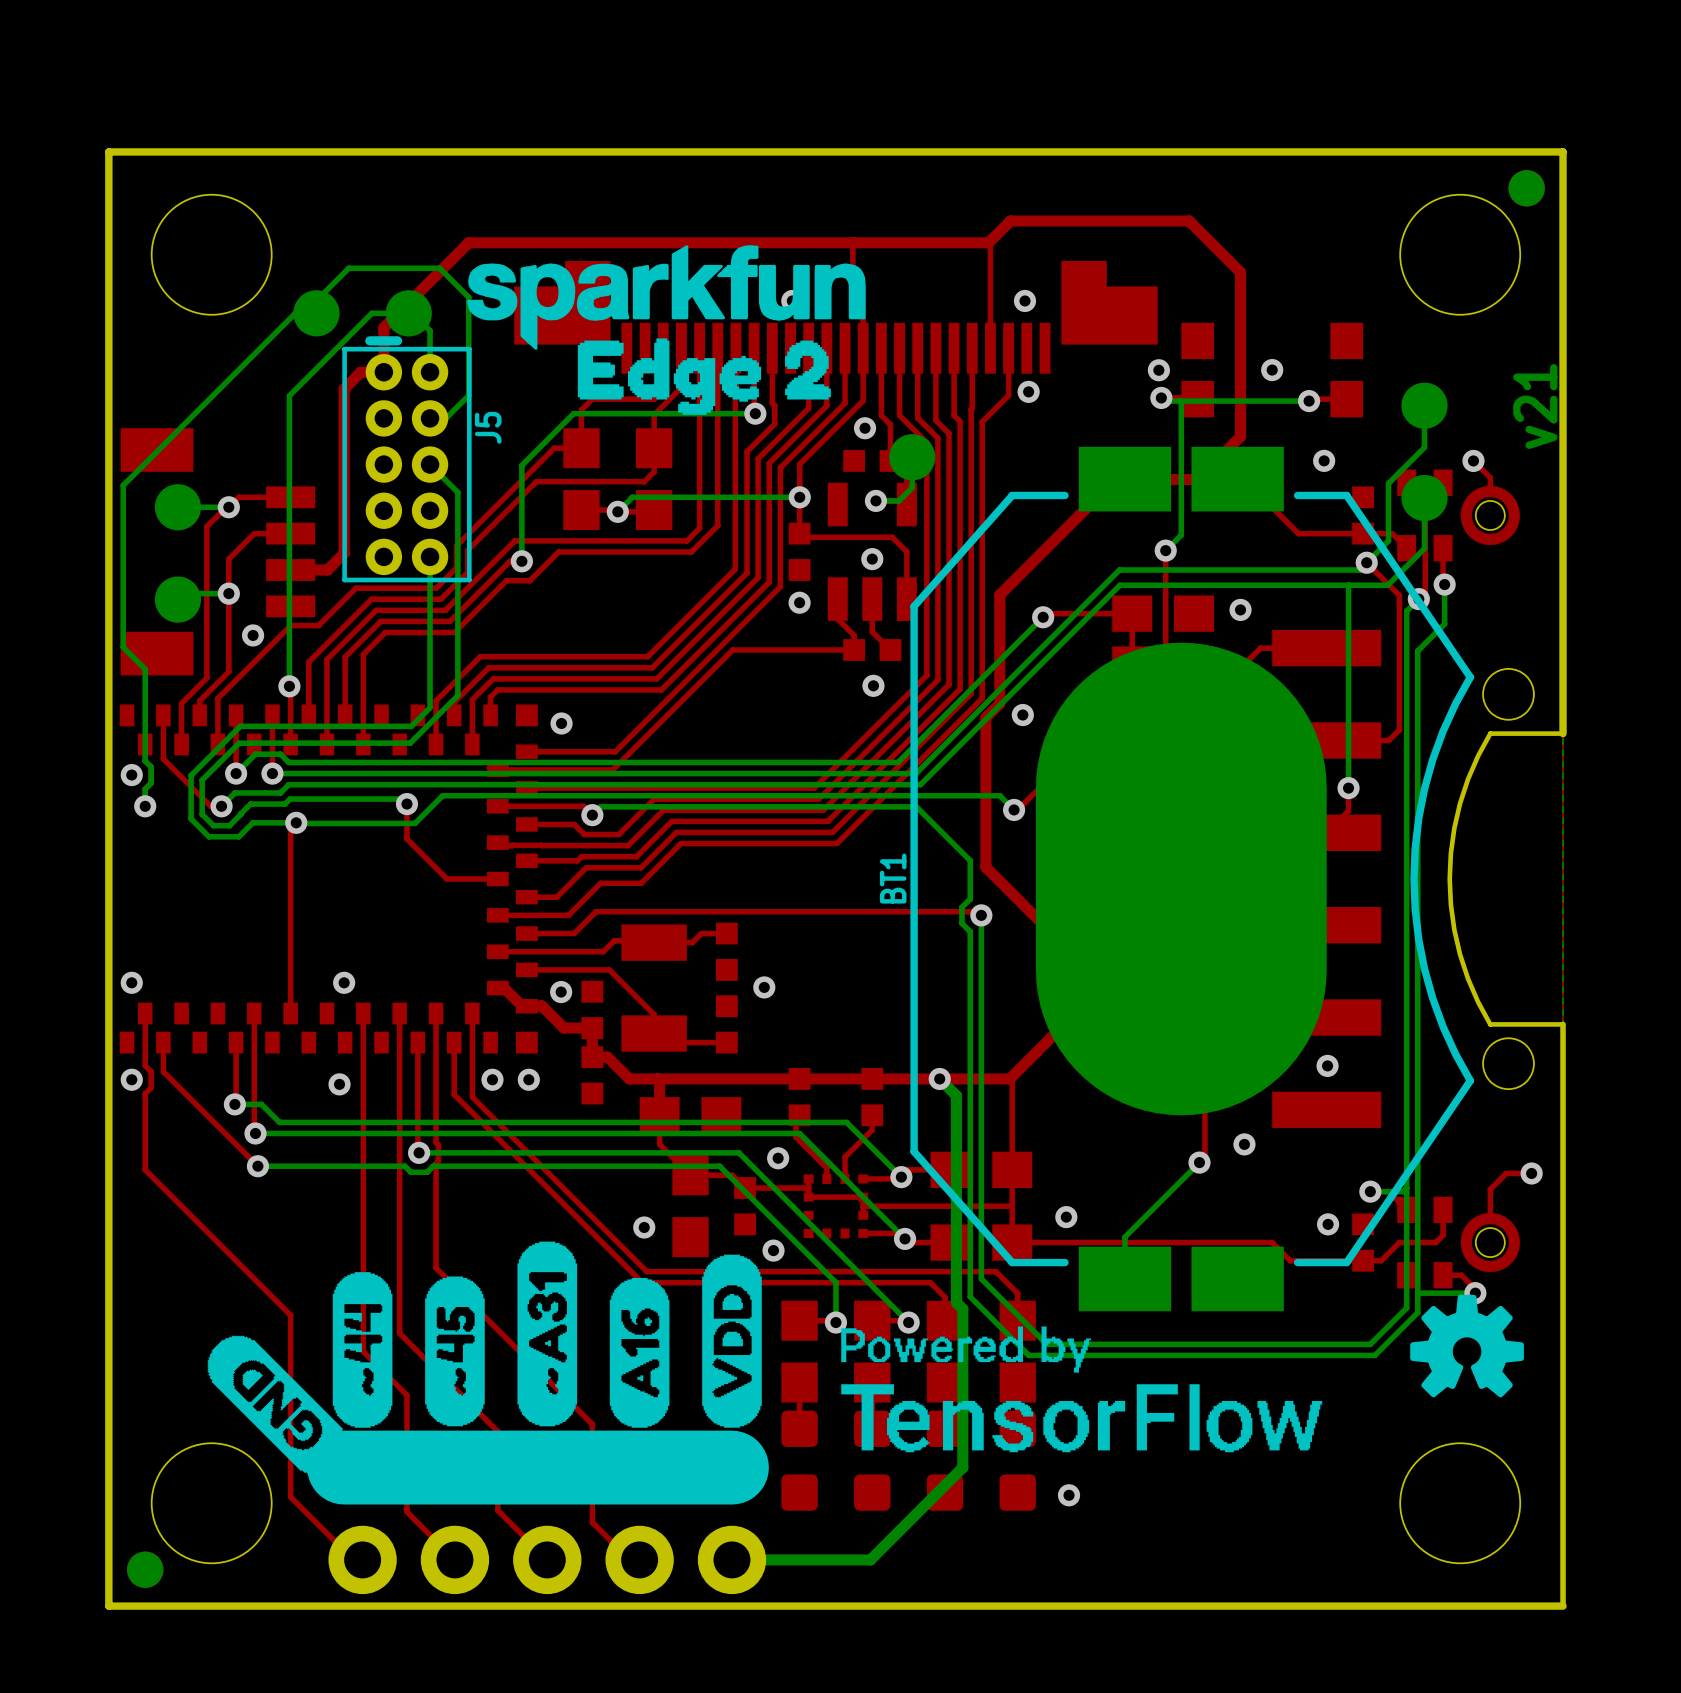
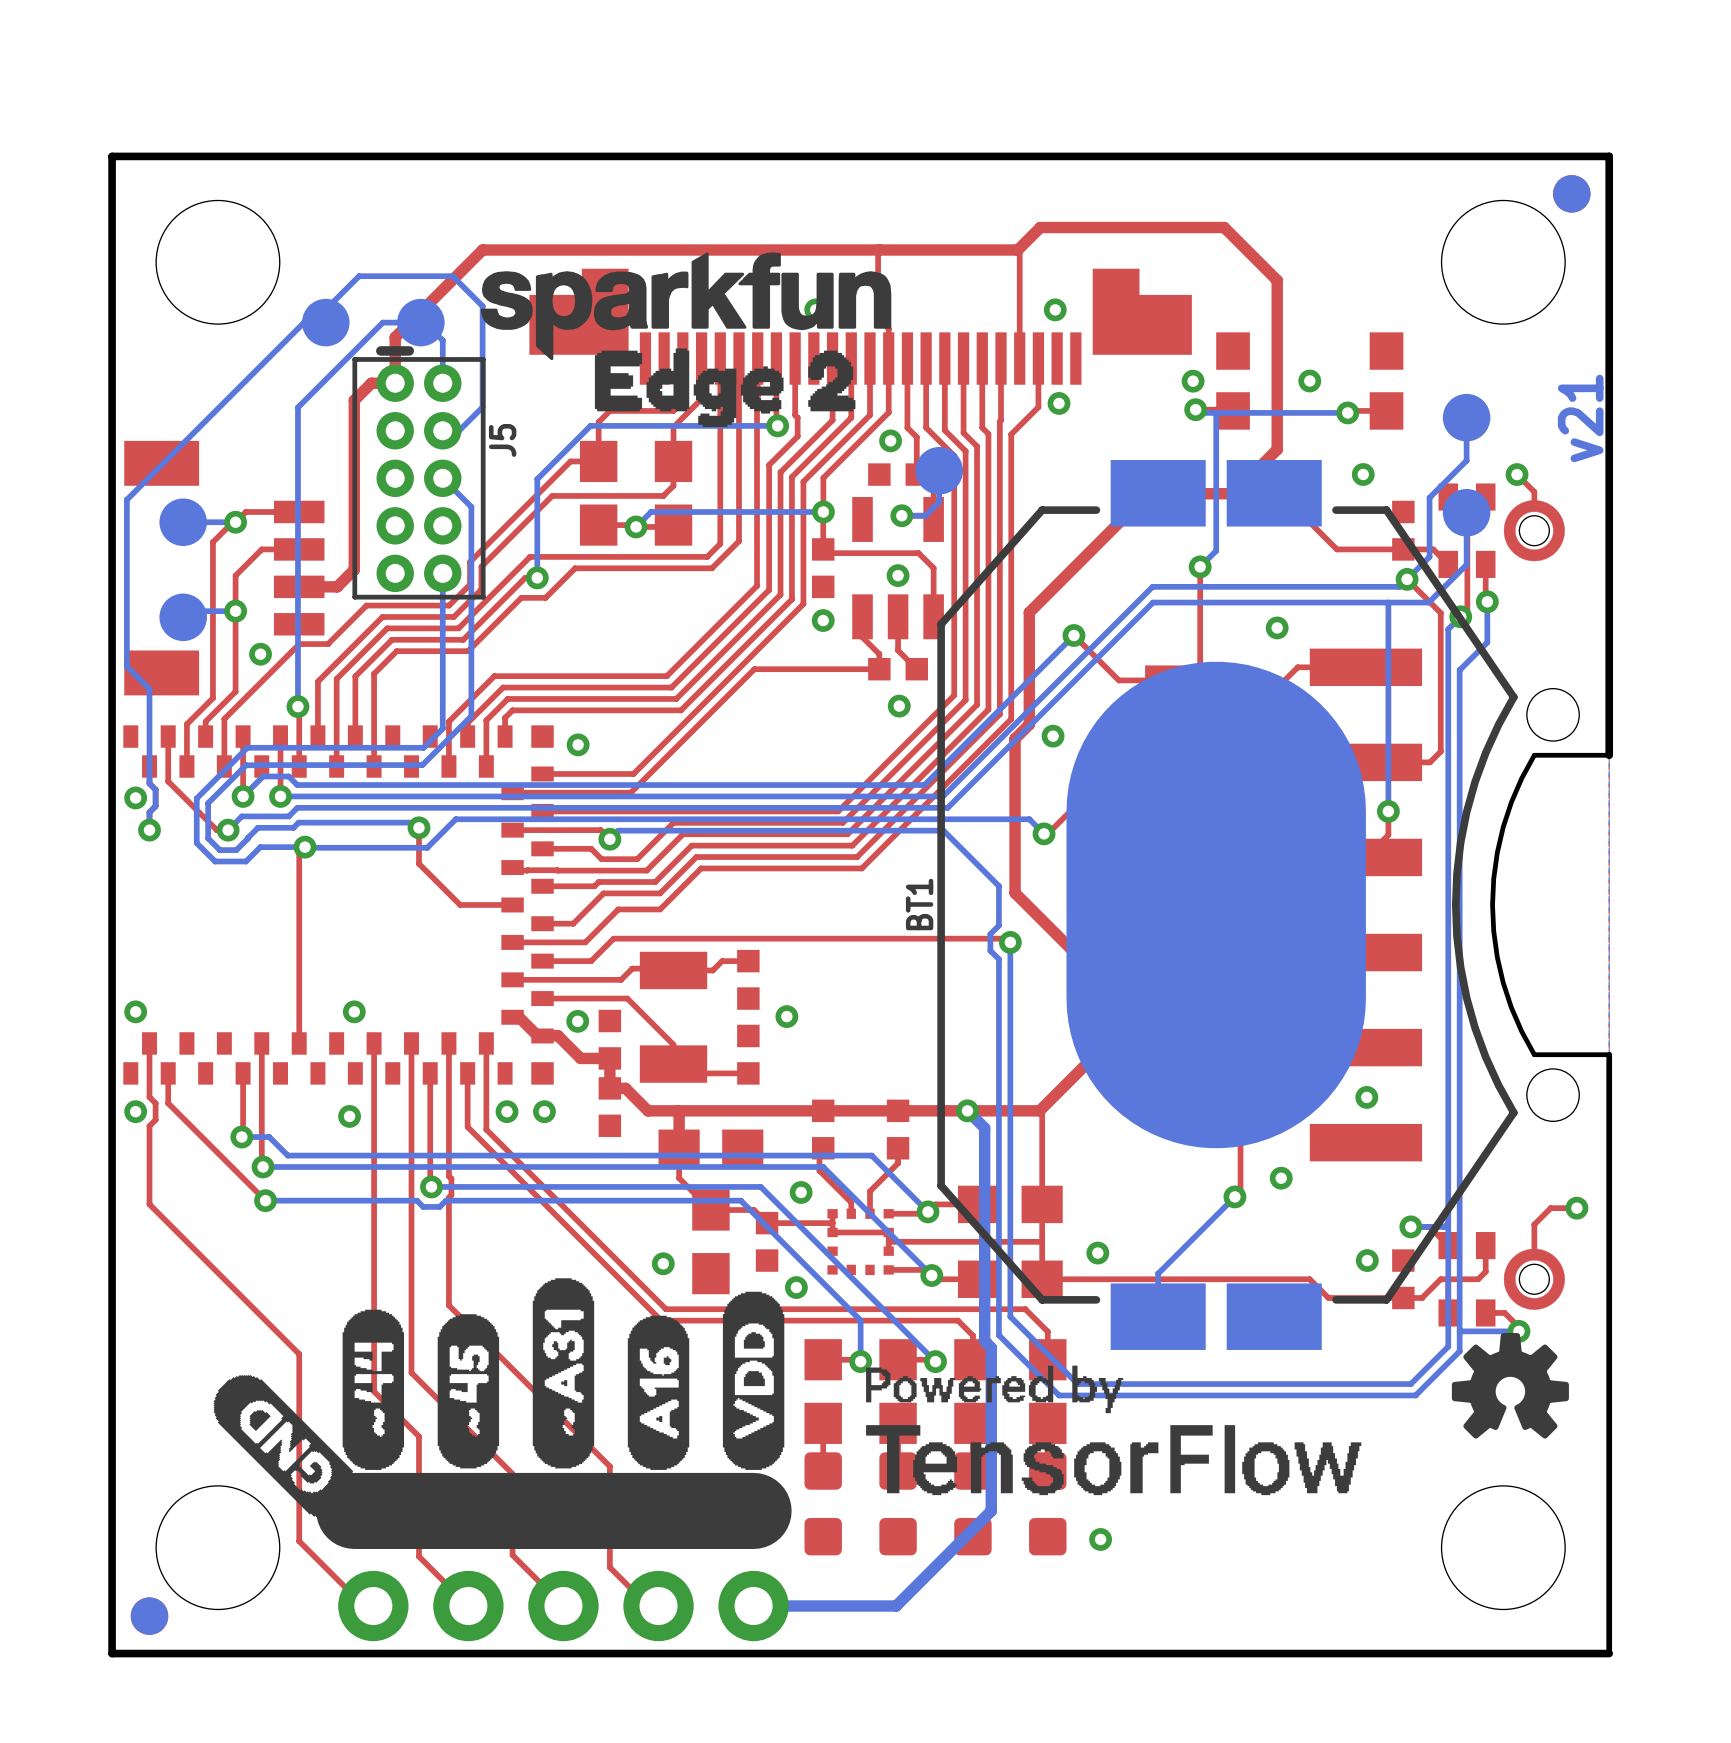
part: (1163, 613) -> none
top track: (1043, 617) (1046, 613) (1132, 613) (1132, 660) -> (1073, 635) (1118, 680) (1165, 680)

